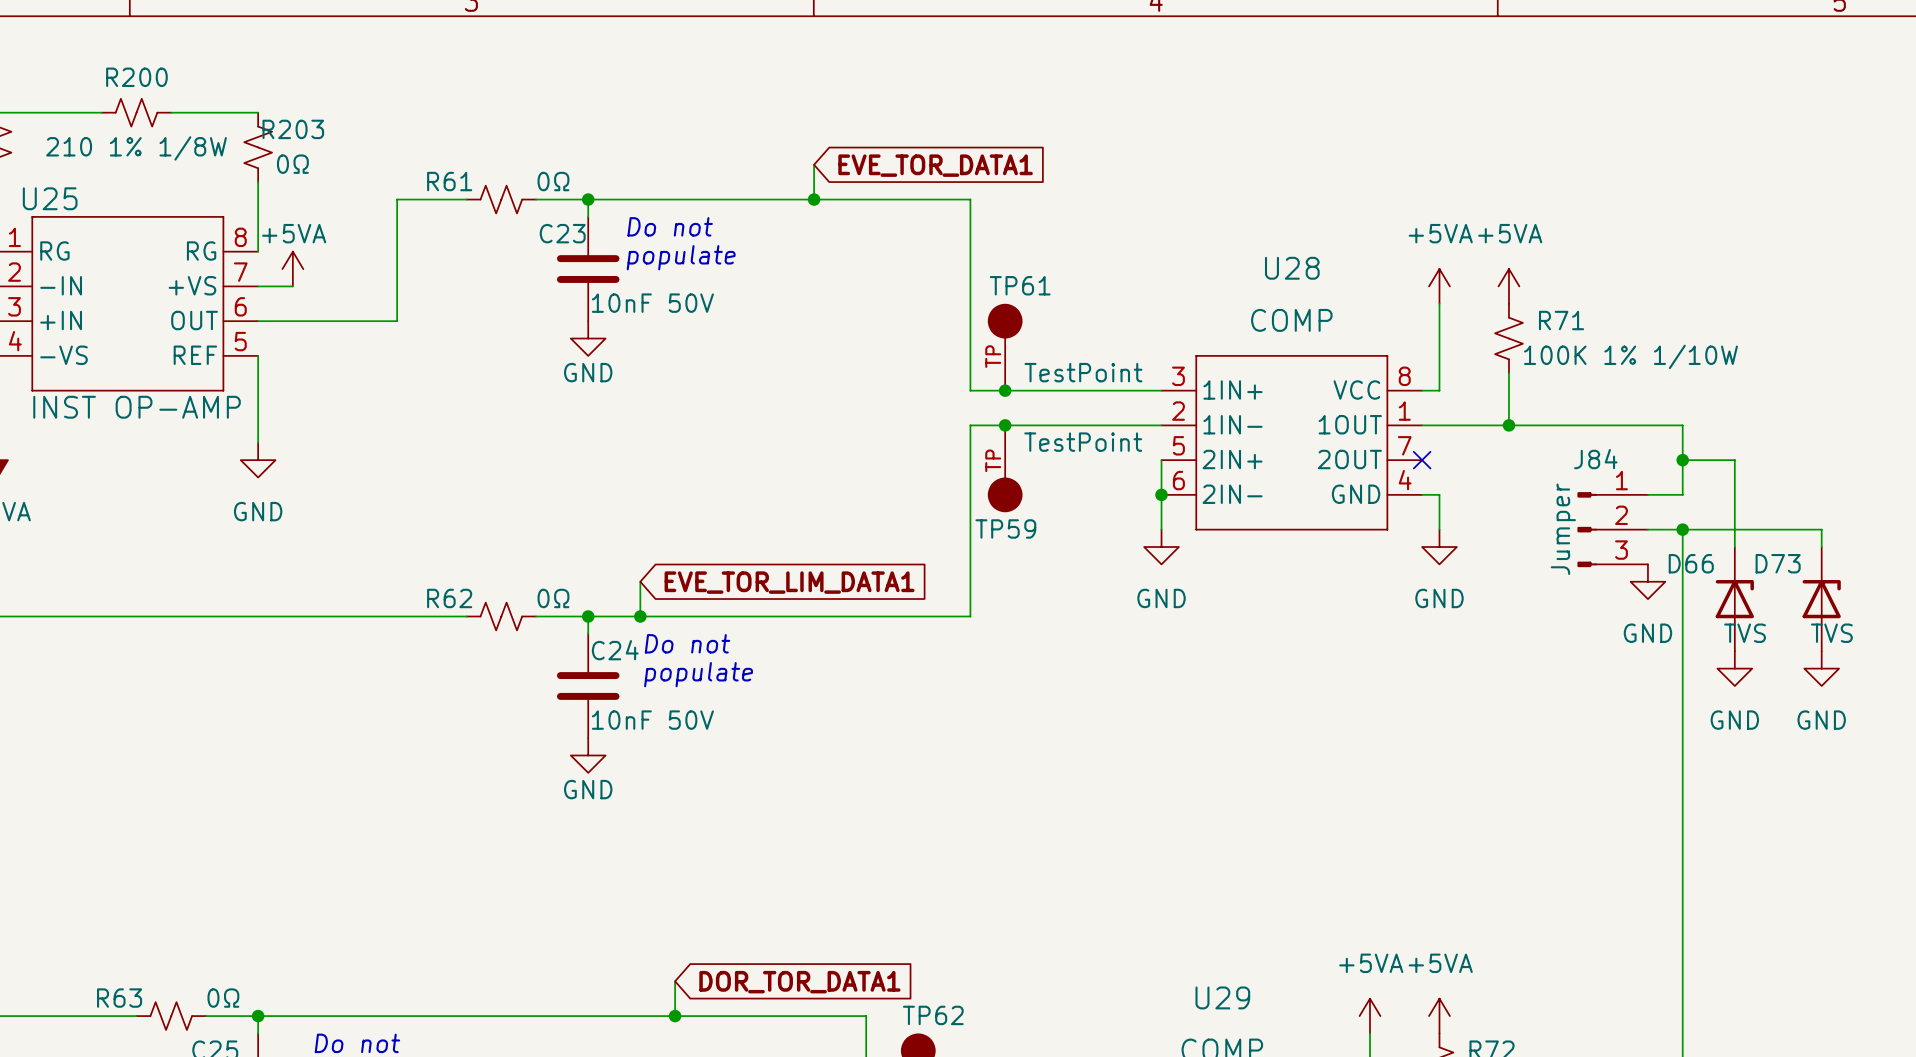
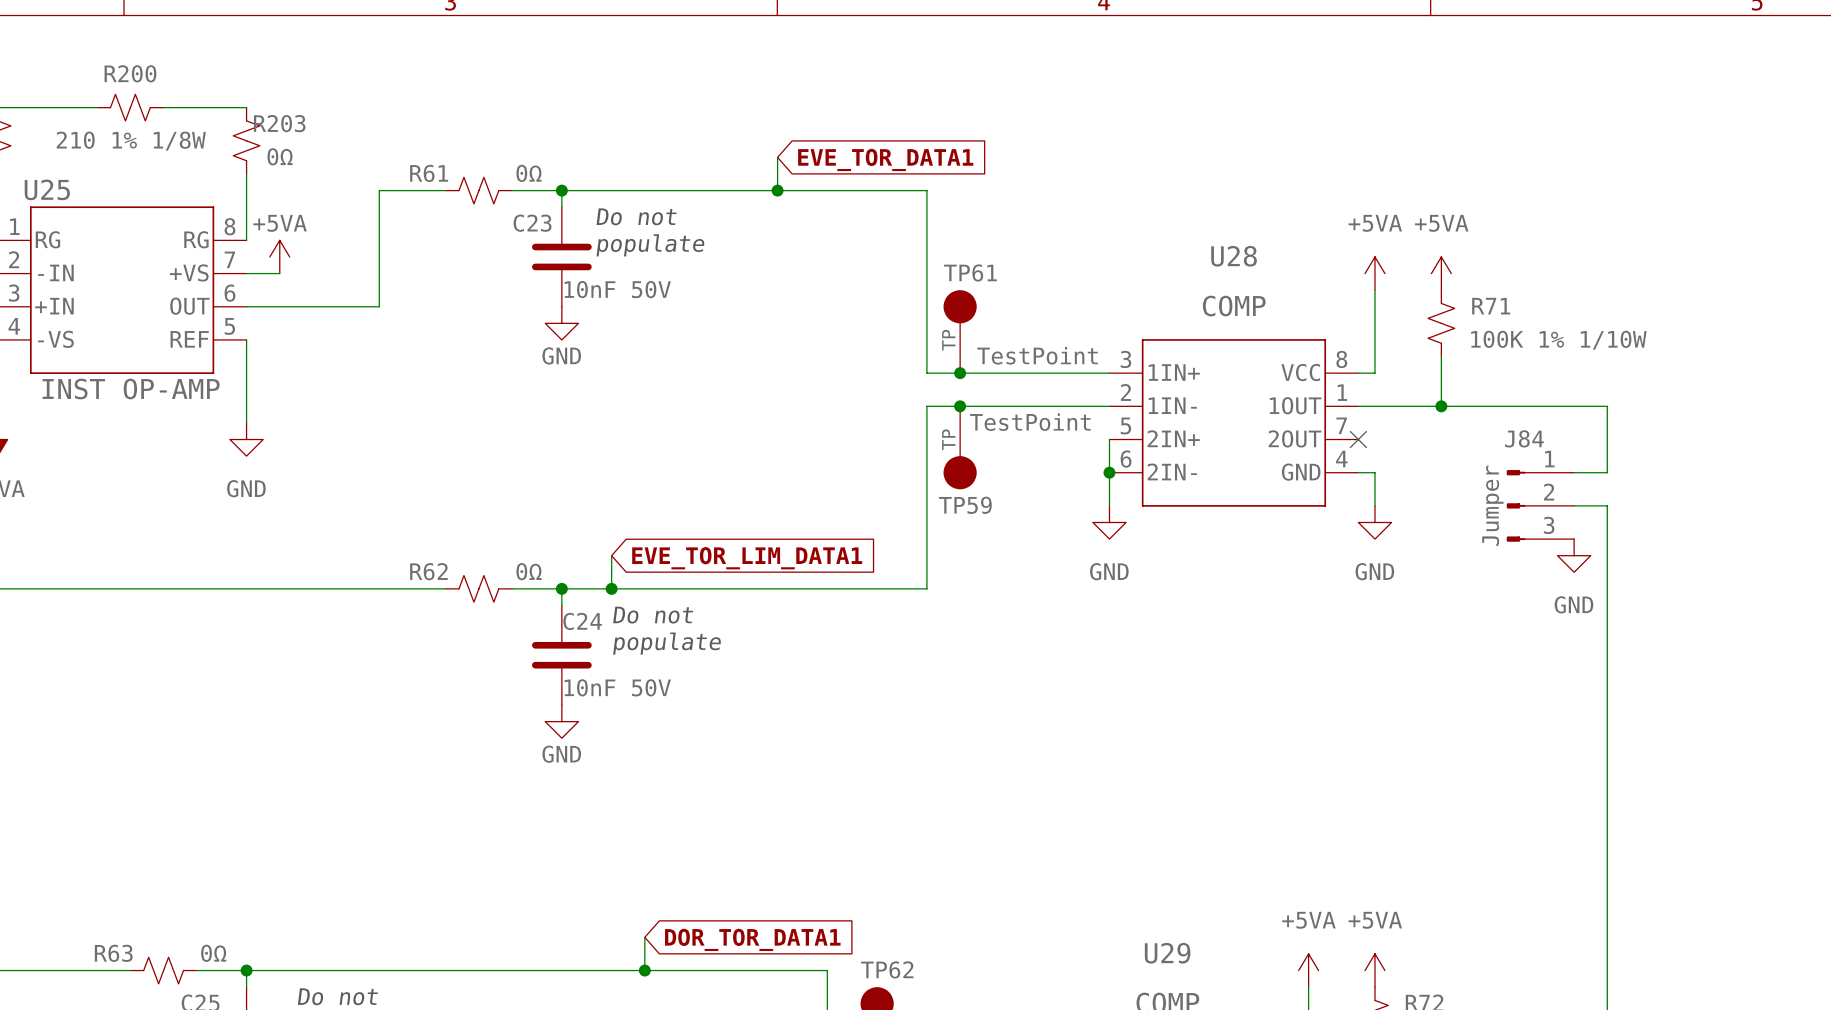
wire: (1682, 460) (1734, 460) (1734, 547) -> none
junction: (1682, 460) -> none
wire: (1682, 529) (1821, 529) (1821, 547) -> none
junction: (1682, 529) -> none
D66: TVS (1734, 599) -> none
D73: TVS (1821, 599) -> none
power symbol: GND (1734, 668) -> none
power symbol: GND (1821, 668) -> none

